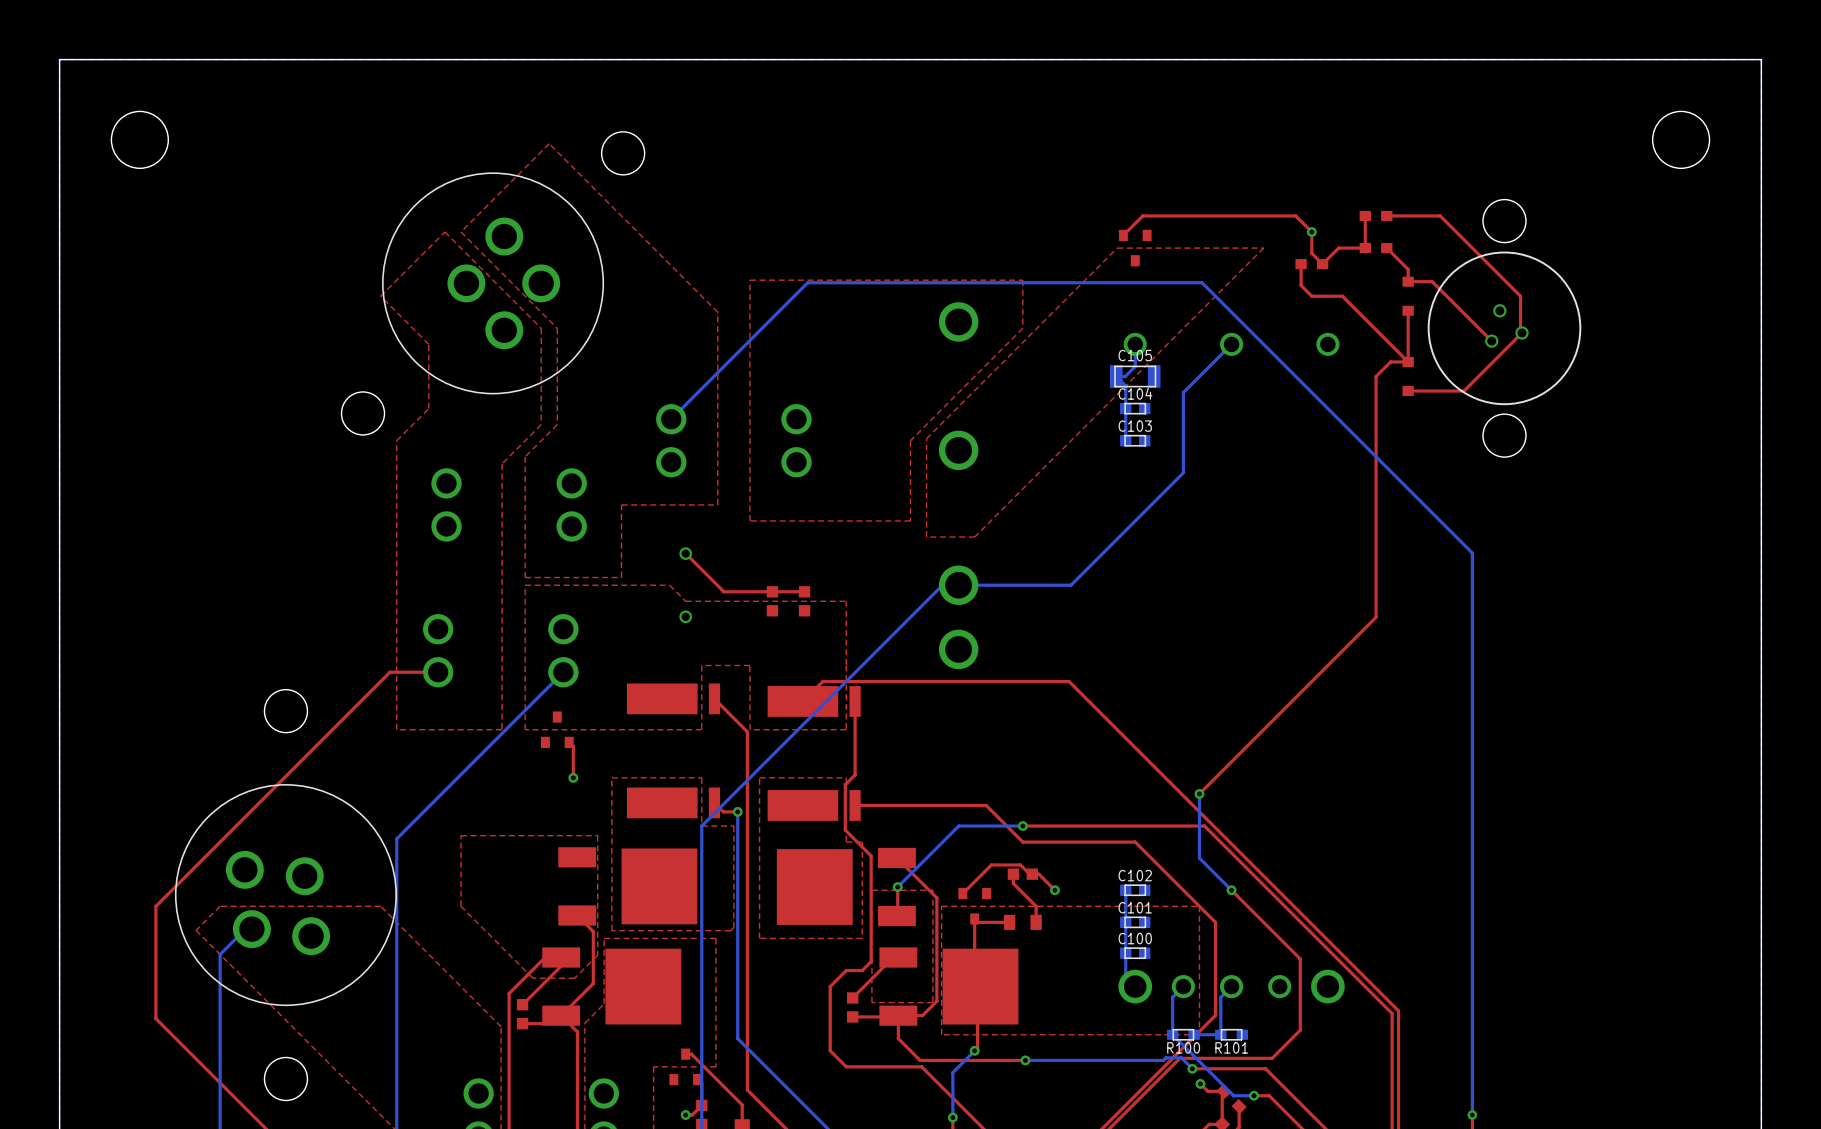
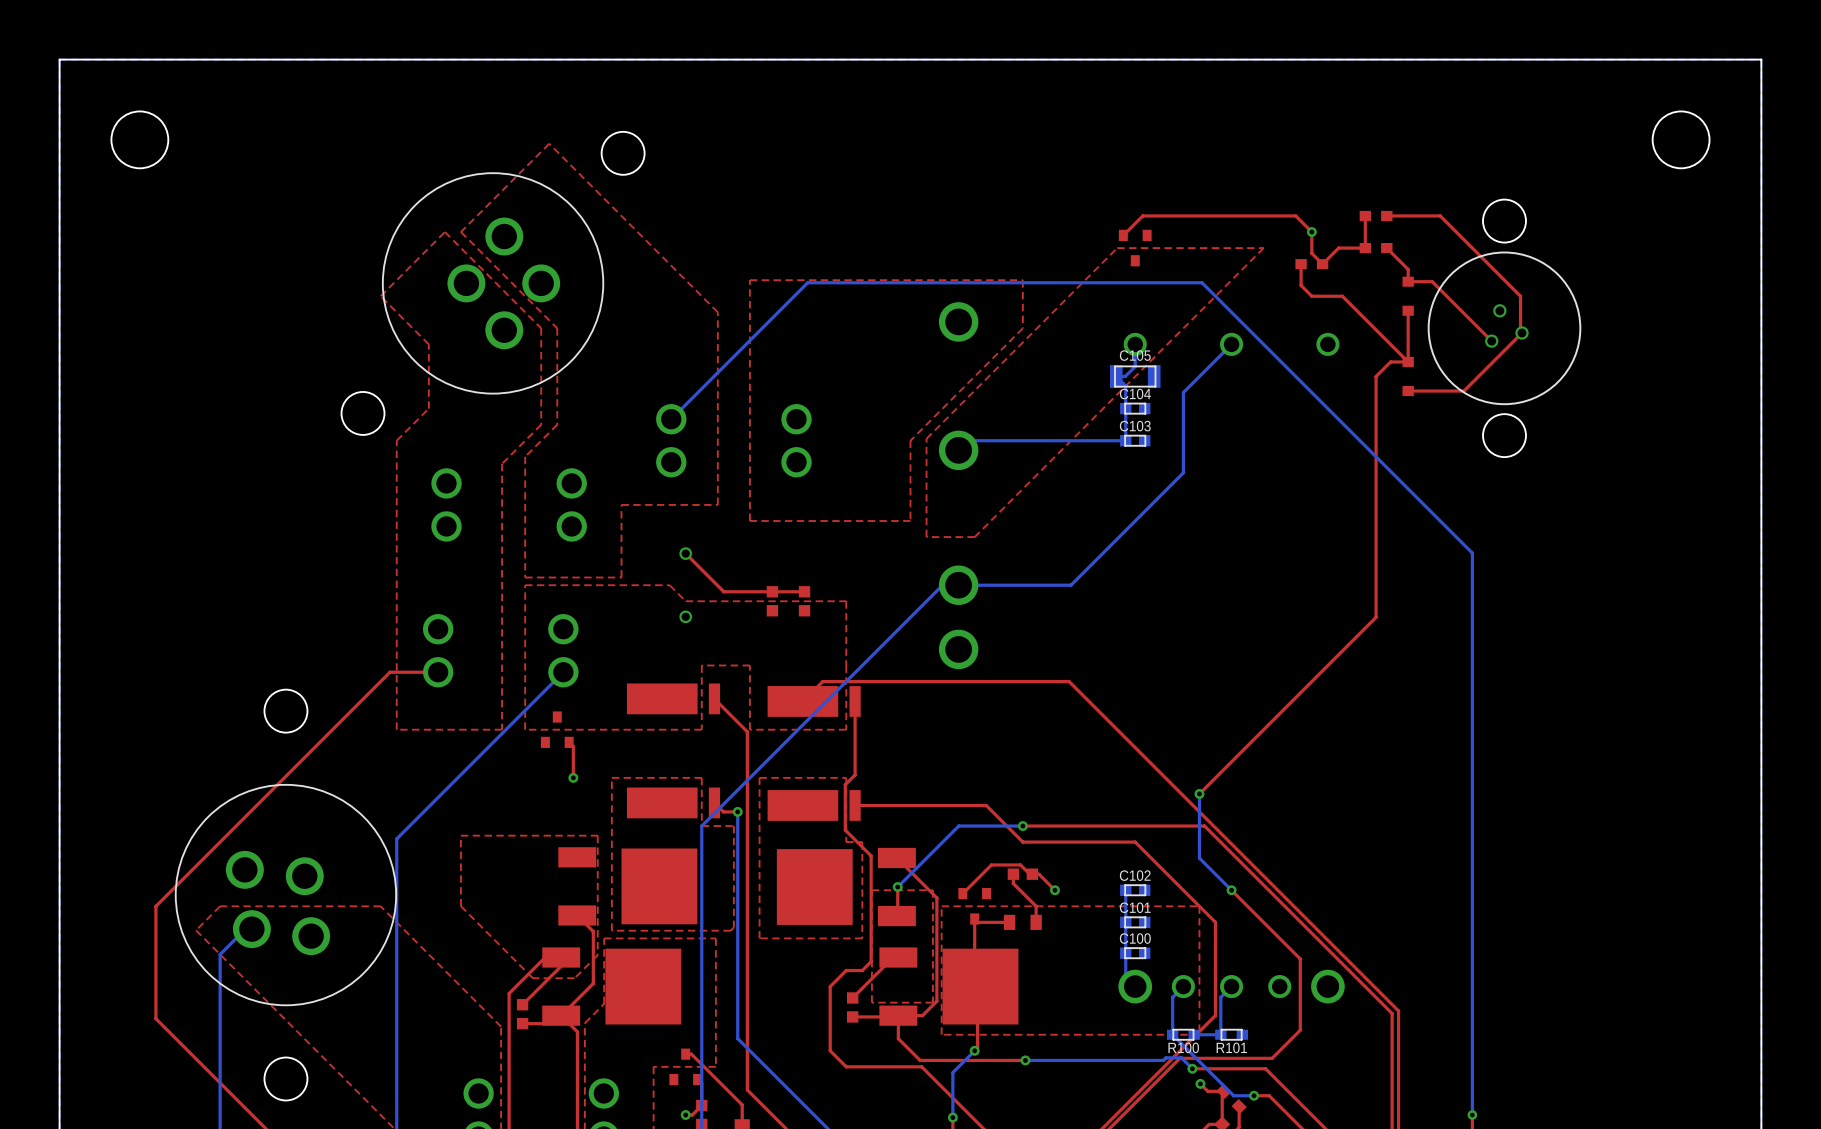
bottom track: none -> (1125, 440) (968, 440) (958, 450)

